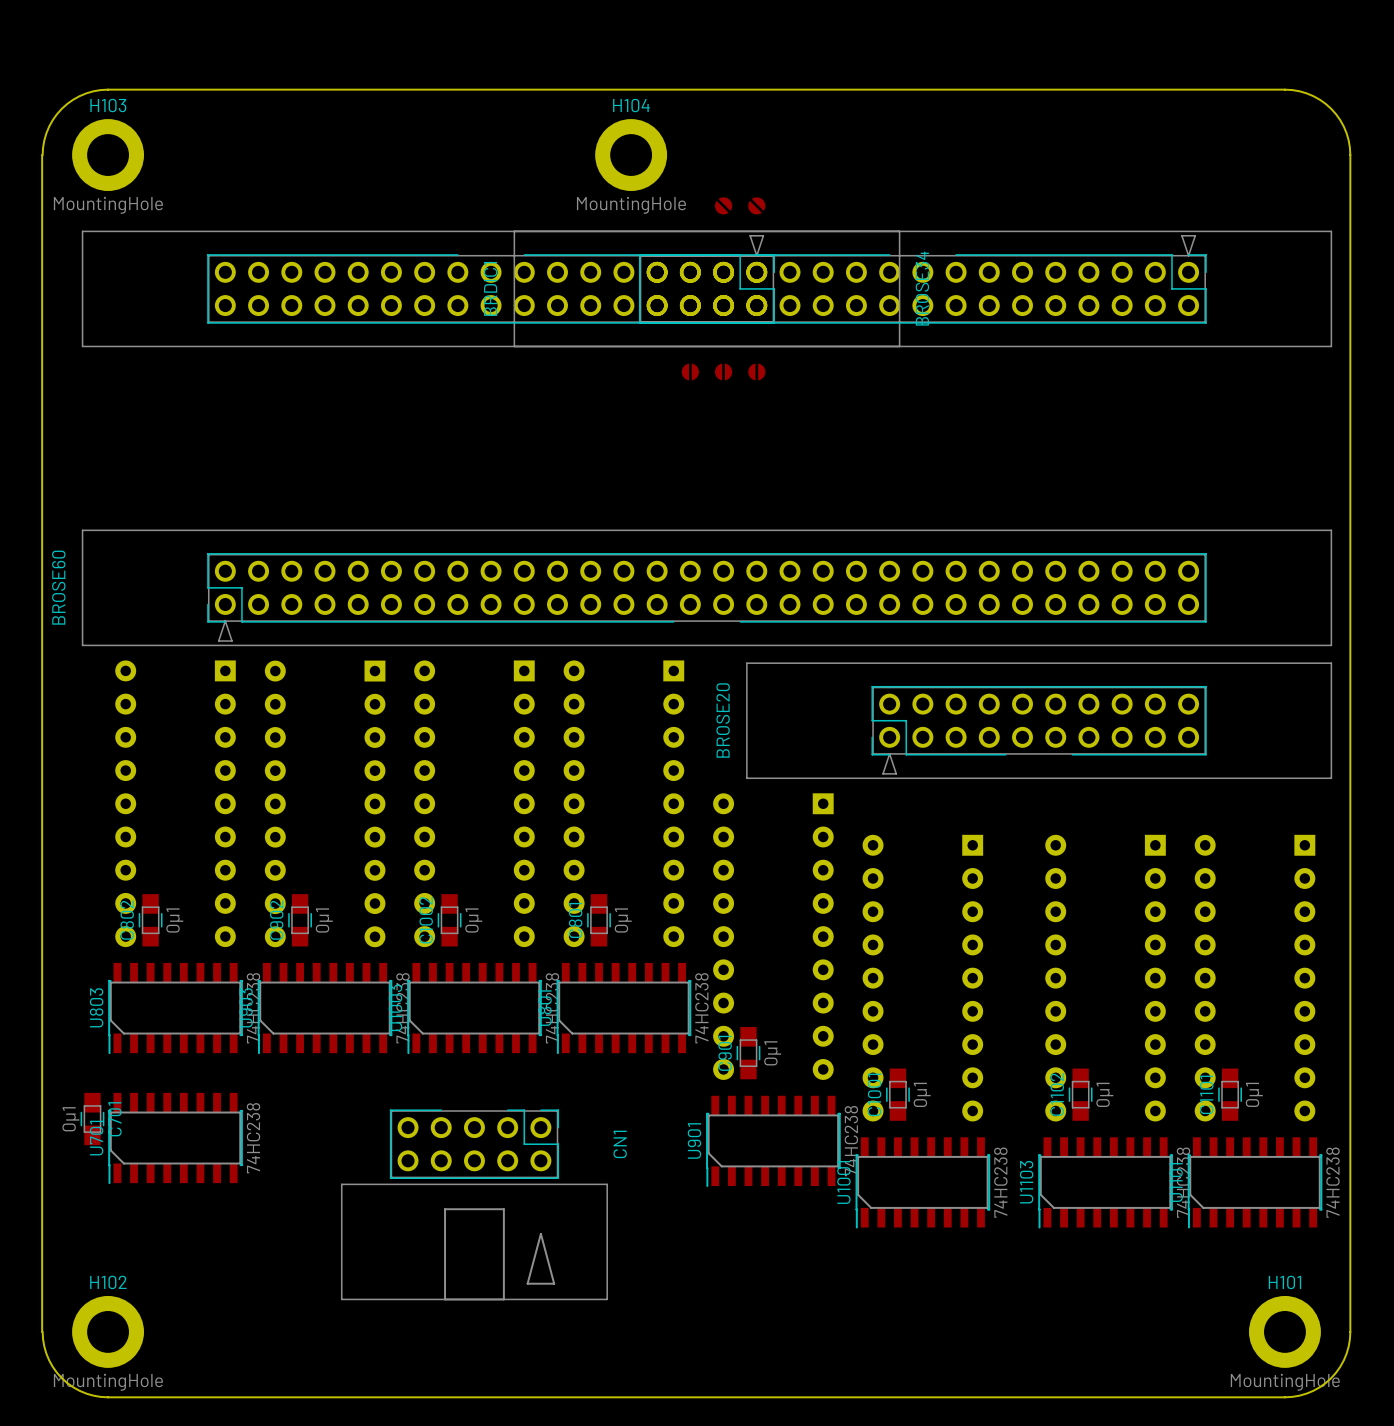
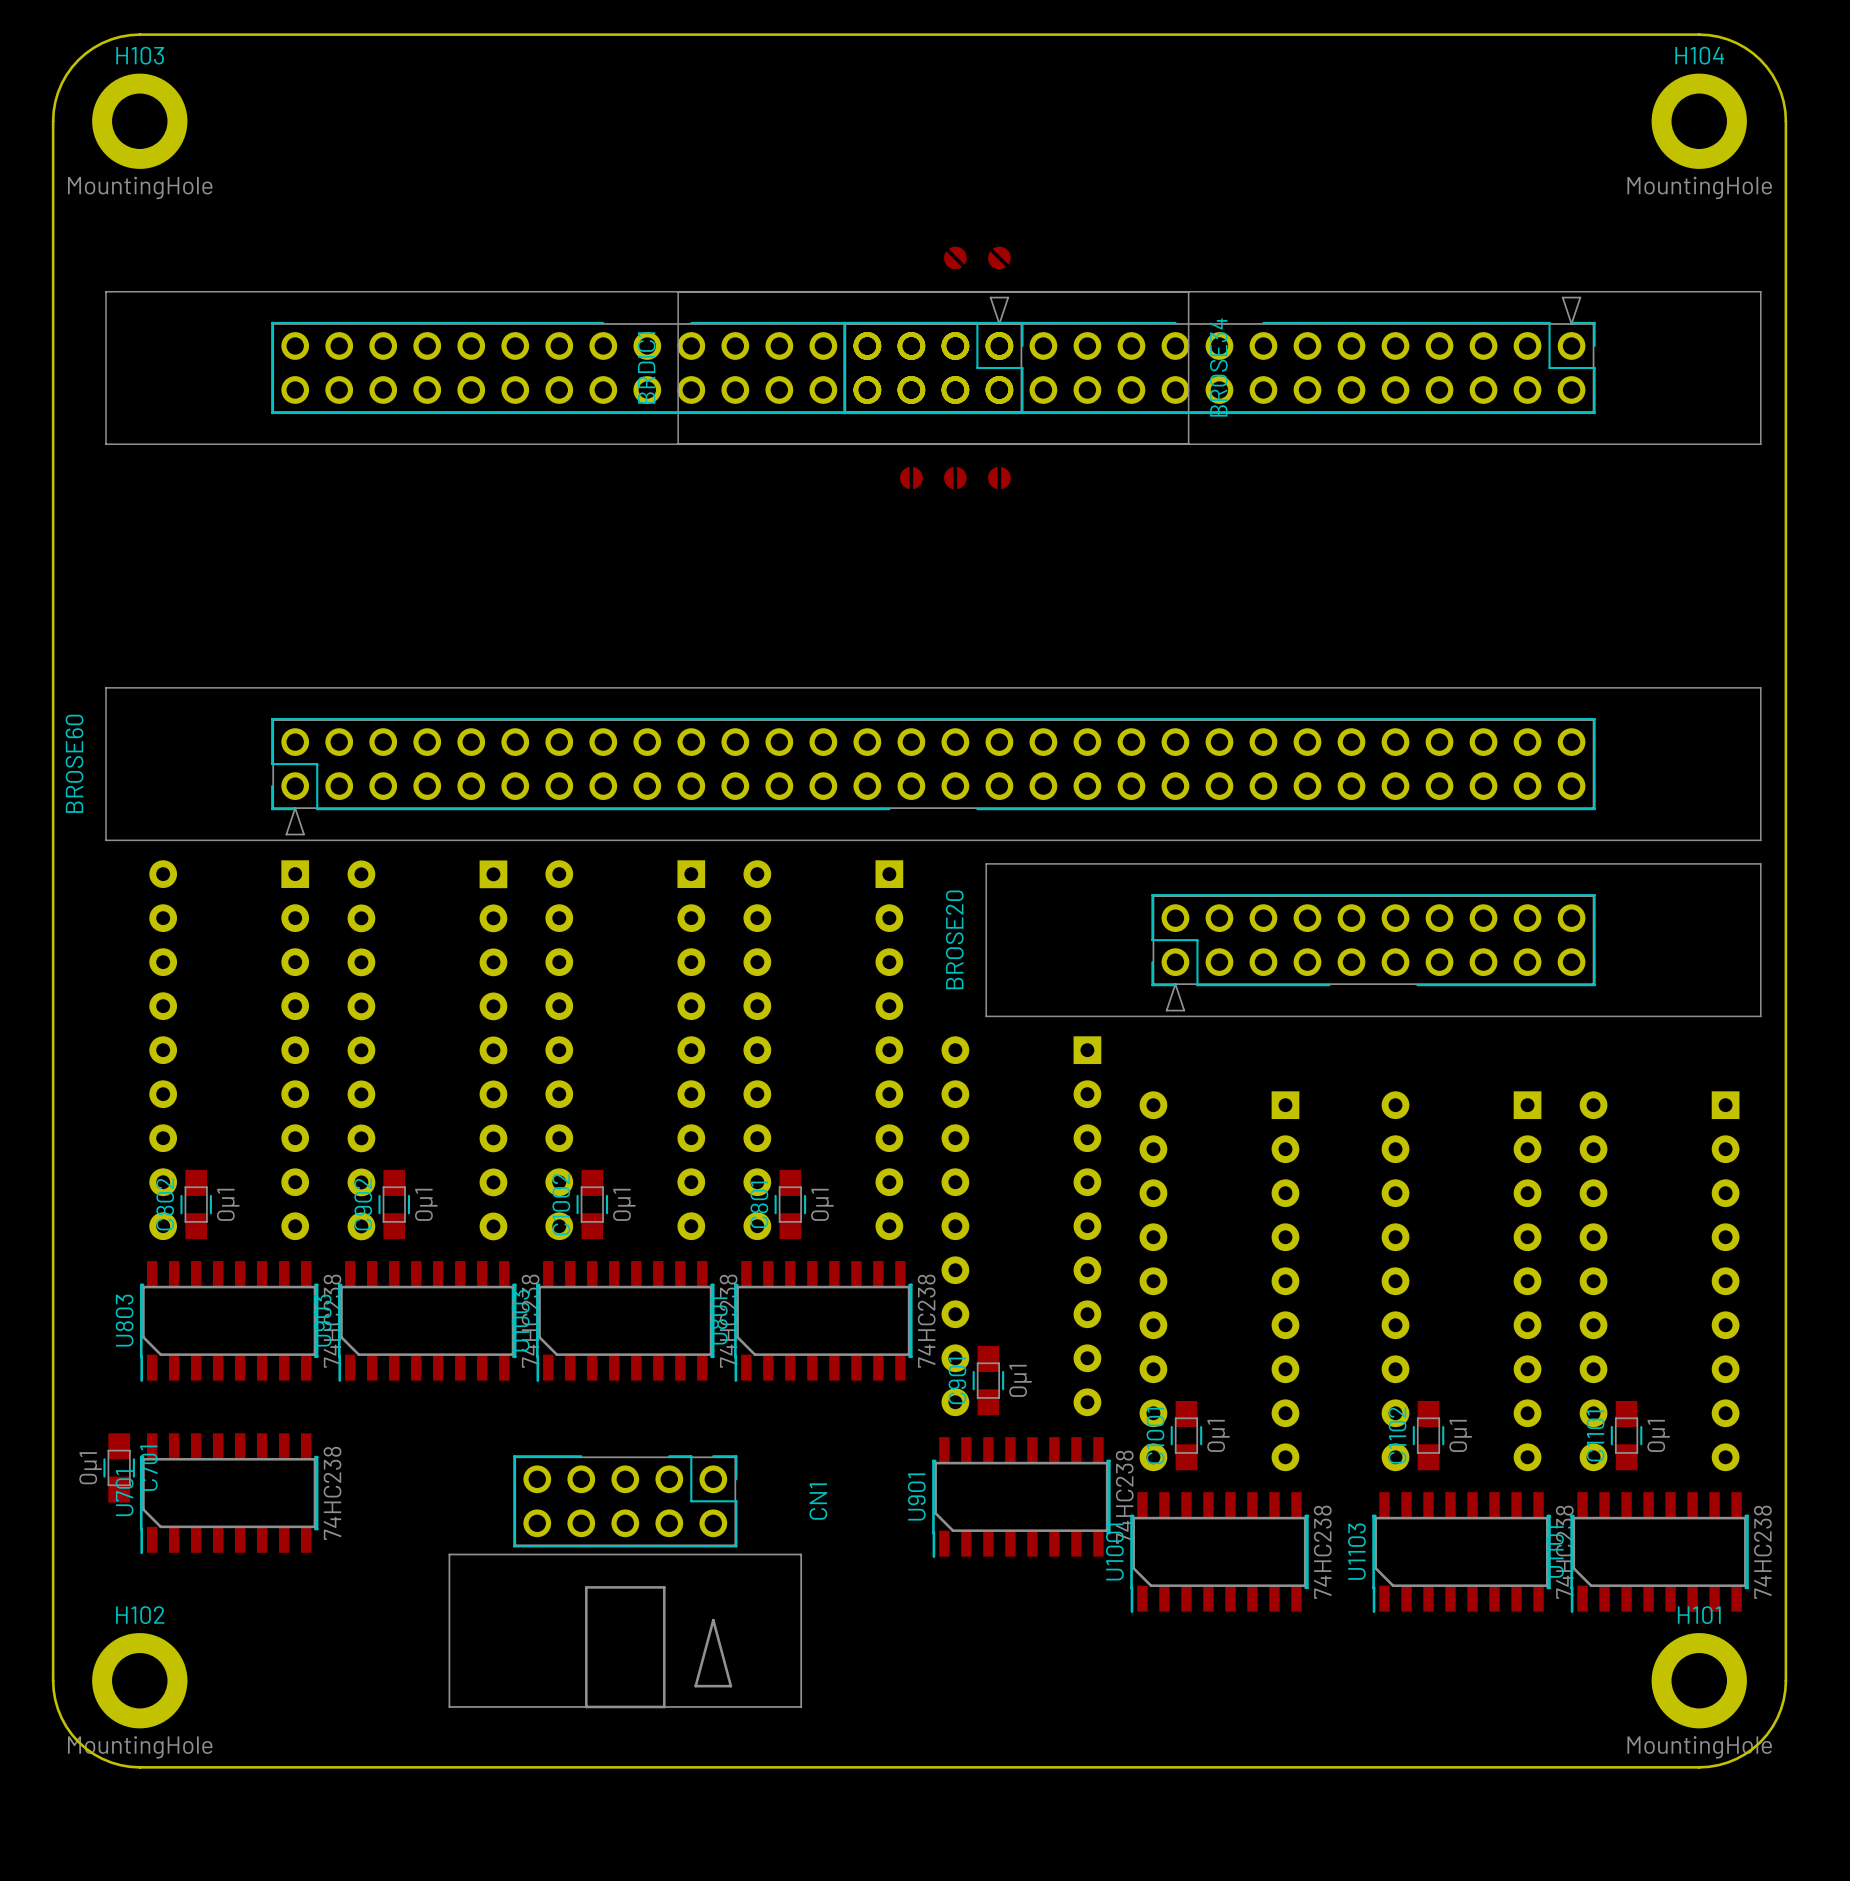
board edge: (42, 155) (44, 140) (49, 126) (61, 108) (79, 96) (93, 91) (108, 89) (1284, 89) (1306, 93) (1319, 99) (1331, 108) (1340, 120) (1346, 133) (1350, 155) -> (1785, 1680) (1781, 1709) (1772, 1726) (1760, 1741) (1745, 1754) (1727, 1762) (1699, 1767) (139, 1767) (111, 1762) (93, 1754) (78, 1741) (66, 1726) (58, 1709) (53, 1680) (53, 121) (58, 92) (66, 75) (78, 59) (93, 47) (111, 39) (139, 34) (1699, 34) (1727, 39) (1745, 47) (1760, 59) (1772, 75) (1781, 92) (1785, 111) (1785, 190)
board edge: (42, 155) (42, 1331) -> none
H103 position: (108, 155) -> (139, 121)
H104 position: (631, 155) -> (1699, 121)
board edge: (1350, 1279) (1349, 1339) (1346, 1353) (1340, 1366) (1331, 1378) (1319, 1387) (1306, 1393) (1284, 1397) (108, 1397) (86, 1393) (73, 1387) (61, 1378) (52, 1366) (46, 1353) (42, 1331) -> none
H102 position: (108, 1331) -> (139, 1680)
H101 position: (1284, 1331) -> (1699, 1680)

